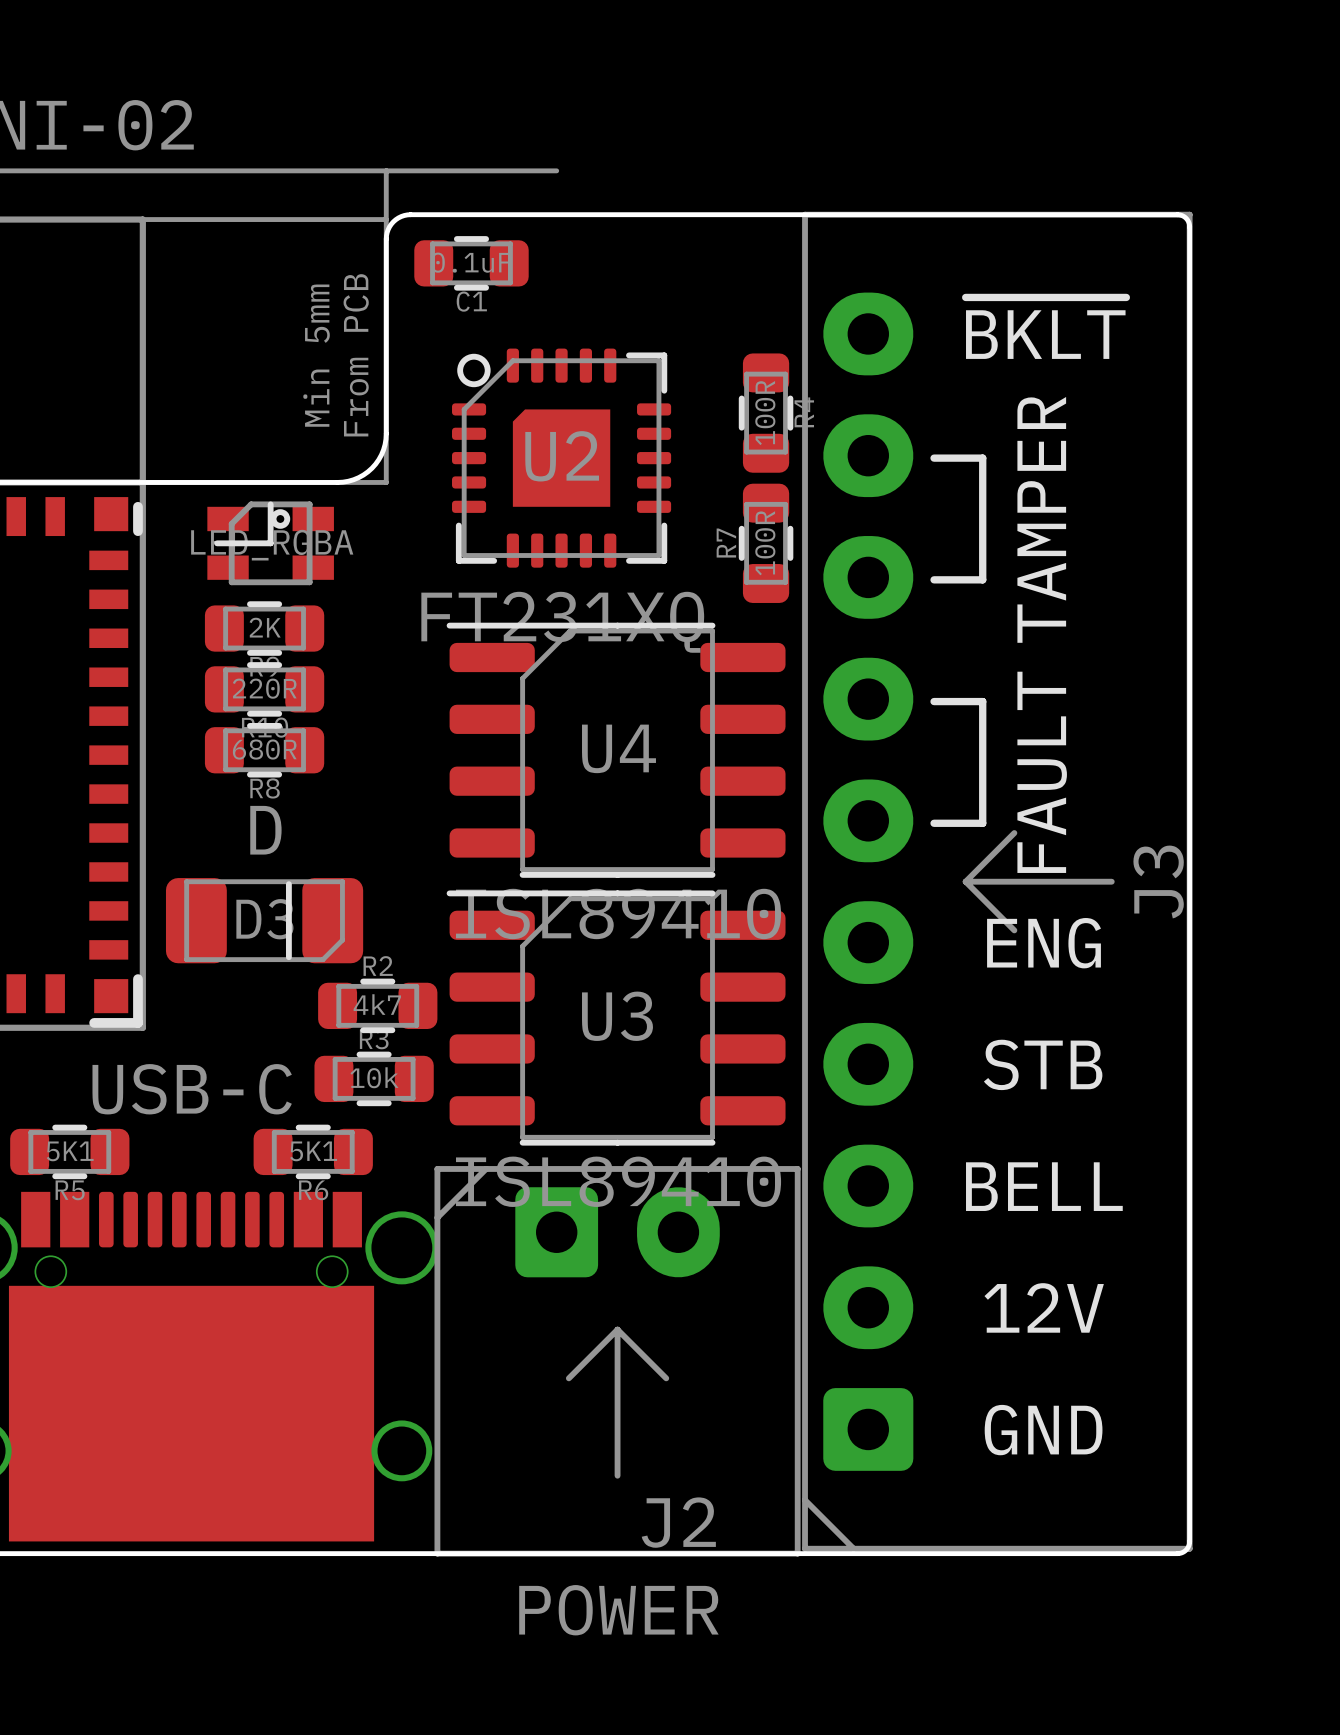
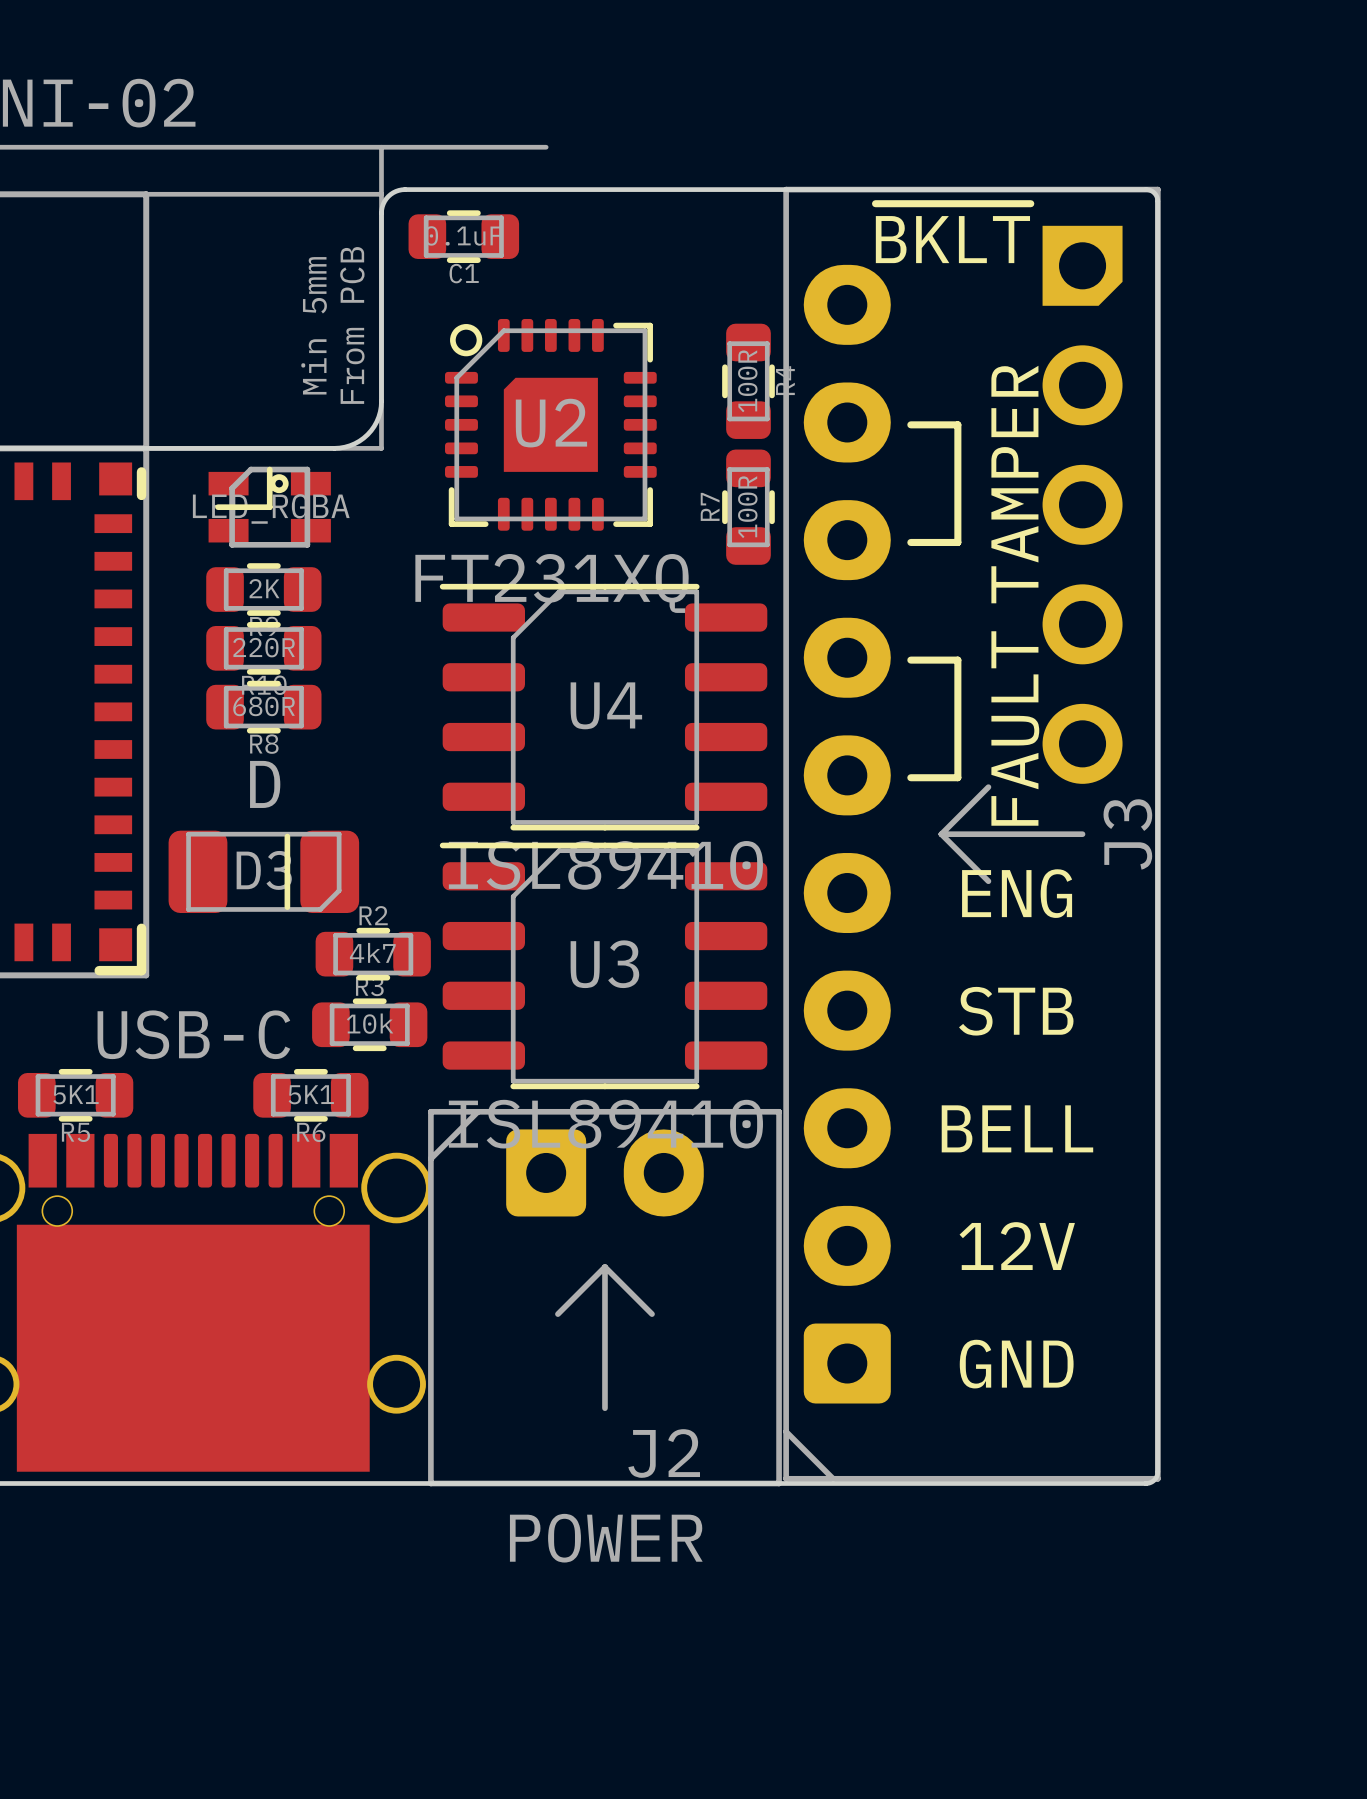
line: (965, 297) (1126, 297) -> (875, 203) (1030, 203)
text position: BKLT (1045, 334) -> BKLT (952, 239)
part: none -> (1082, 504)

